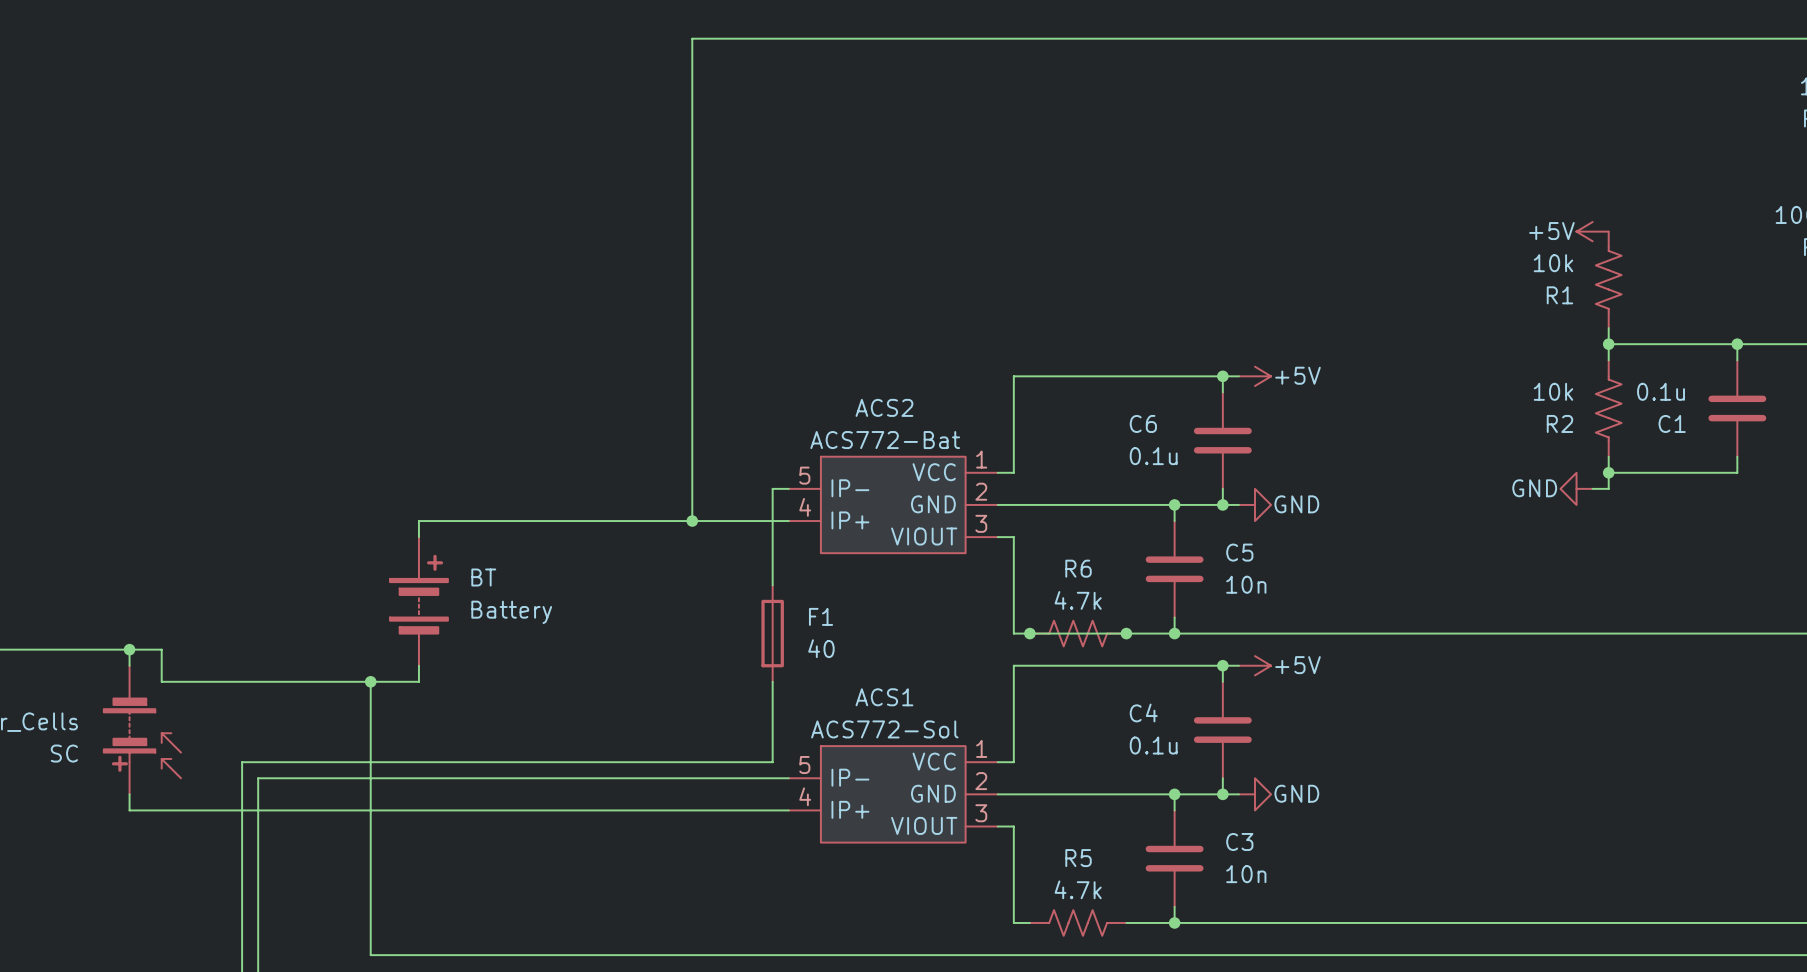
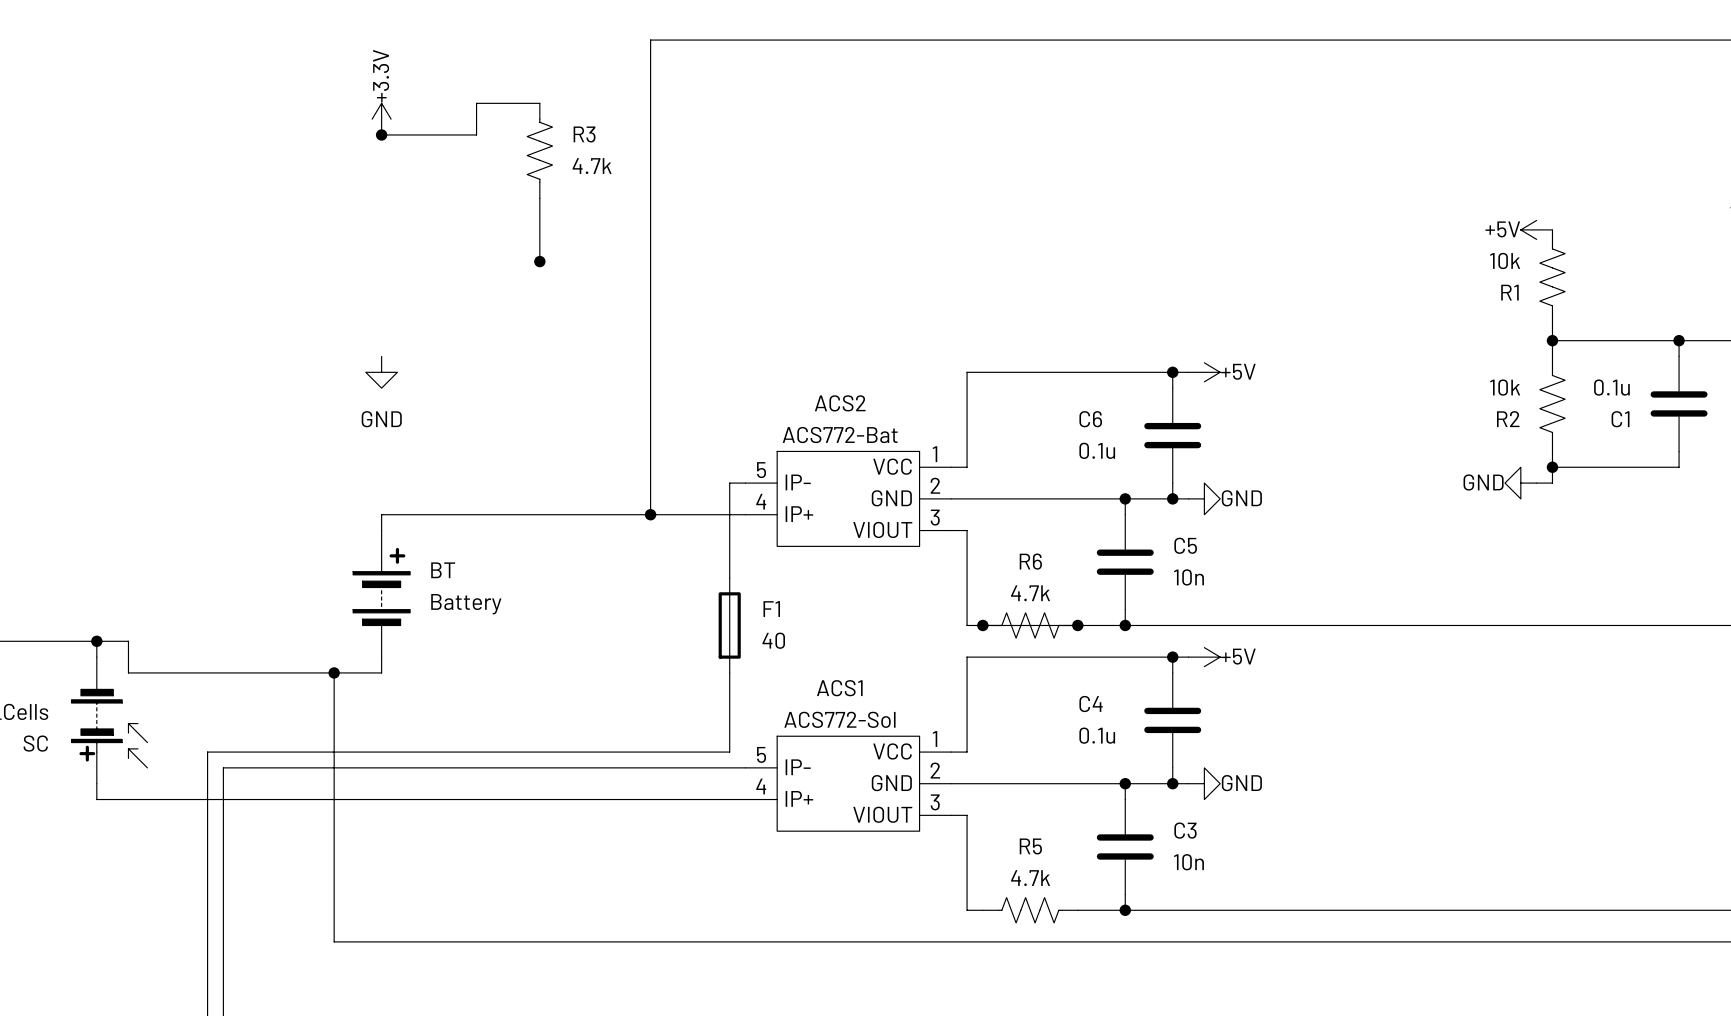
wire: none -> (539, 103) (476, 103) (476, 134) (381, 134)
power symbol: none -> +3.3V (381, 119)
junction: none -> (381, 134)
R3: none -> 4.7k (539, 150)
wire: none -> (539, 198) (539, 261)
junction: none -> (539, 261)
power symbol: none -> GND (381, 372)

